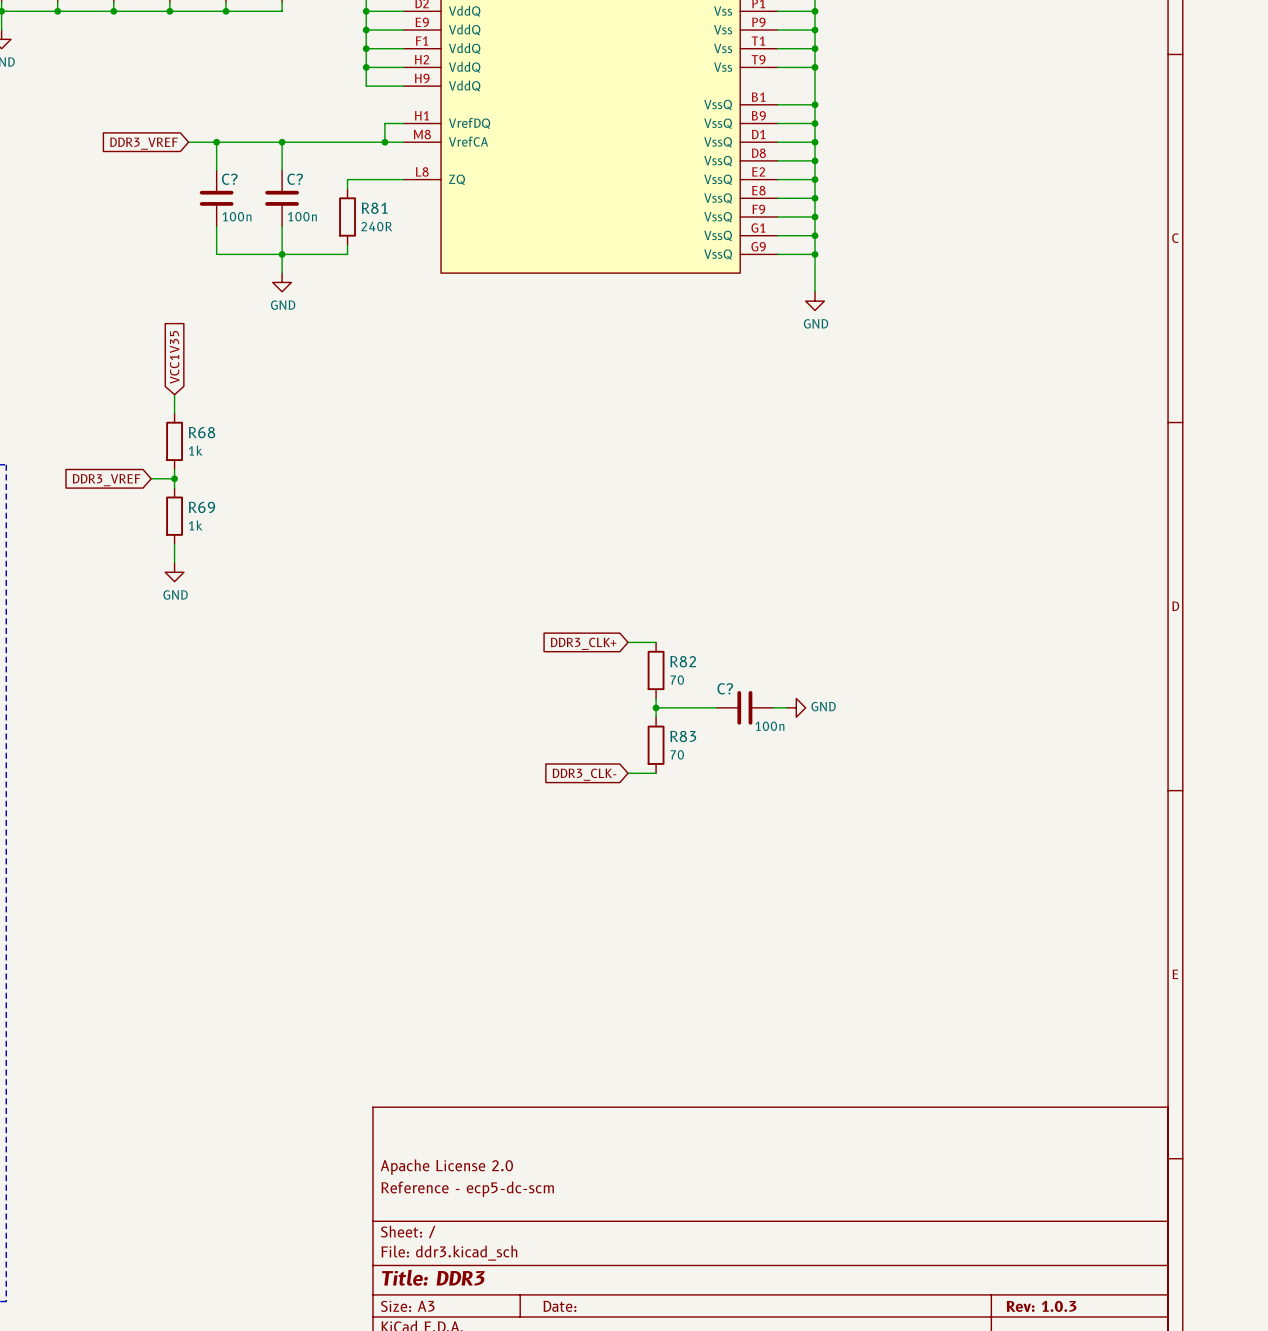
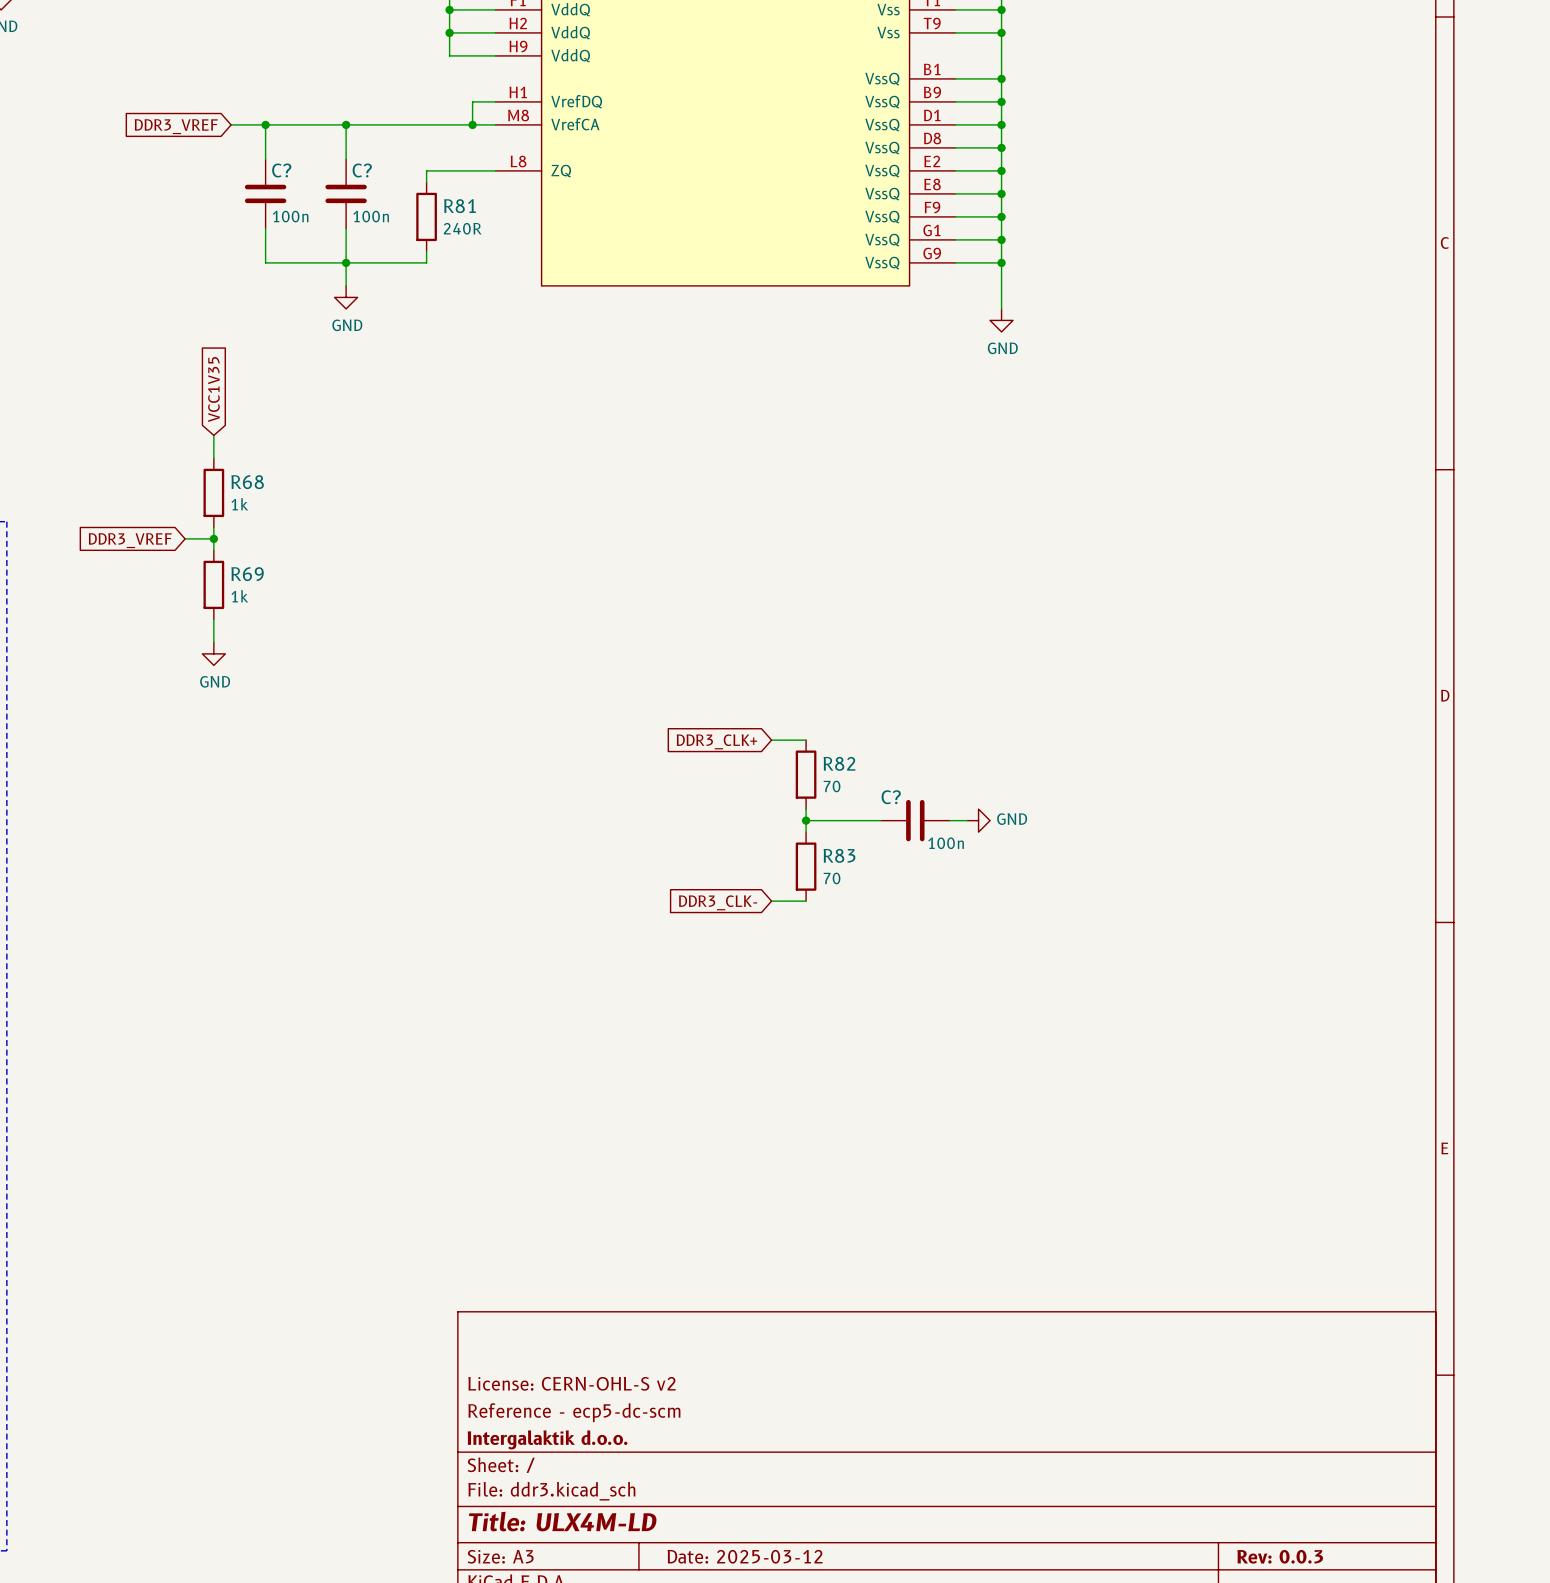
title block: Apache License 2.0 (446, 1167) -> License: CERN-OHL-S v2 (571, 1383)
title block: none -> Intergalaktik d.o.o. (547, 1439)
title block: Title: DDR3 (433, 1277) -> Title: ULX4M-LD (562, 1521)
title block: Date: (559, 1306) -> Date: 2025-03-12 (745, 1556)
title block: Rev: 1.0.3 (1041, 1306) -> Rev: 0.0.3 (1280, 1556)

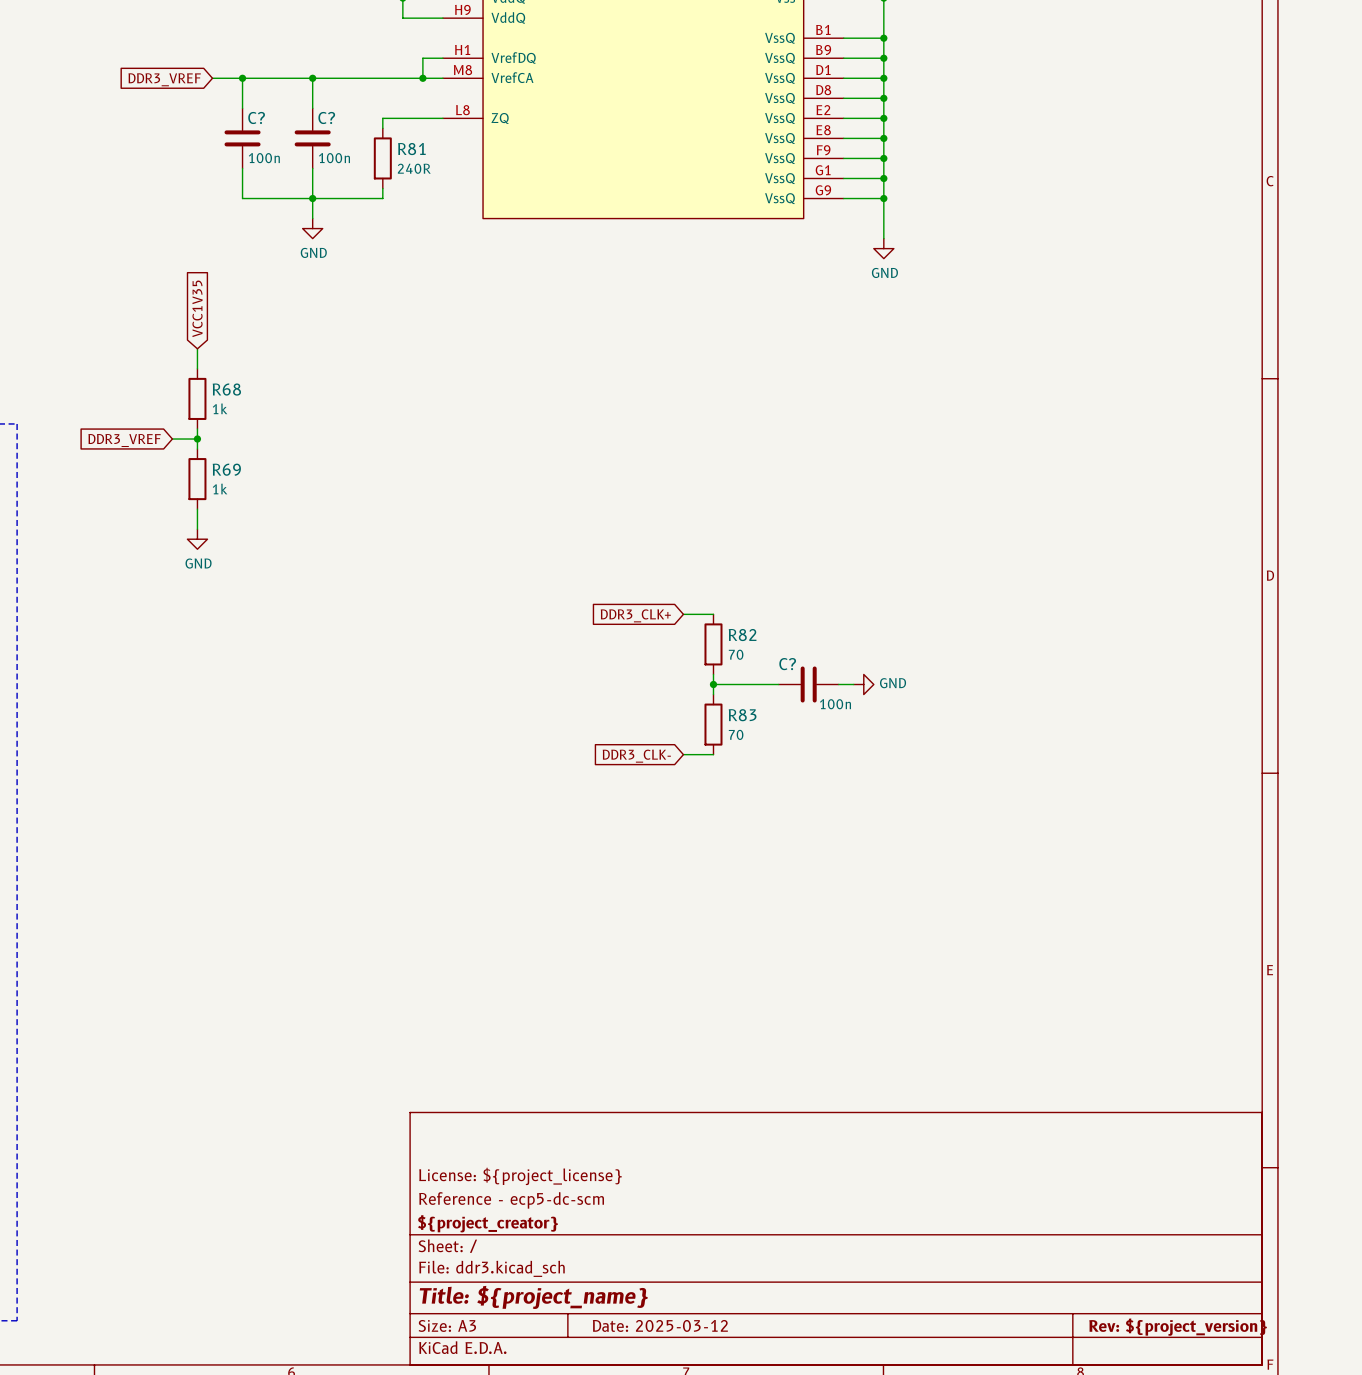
title block: License: CERN-OHL-S v2 (571, 1383) -> License: ${project_license} (520, 1176)
title block: Intergalaktik d.o.o. (547, 1439) -> ${project_creator} (487, 1223)
title block: Title: ULX4M-LD (562, 1521) -> Title: ${project_name} (533, 1297)
title block: Rev: 0.0.3 (1280, 1556) -> Rev: ${project_version} (1178, 1327)

